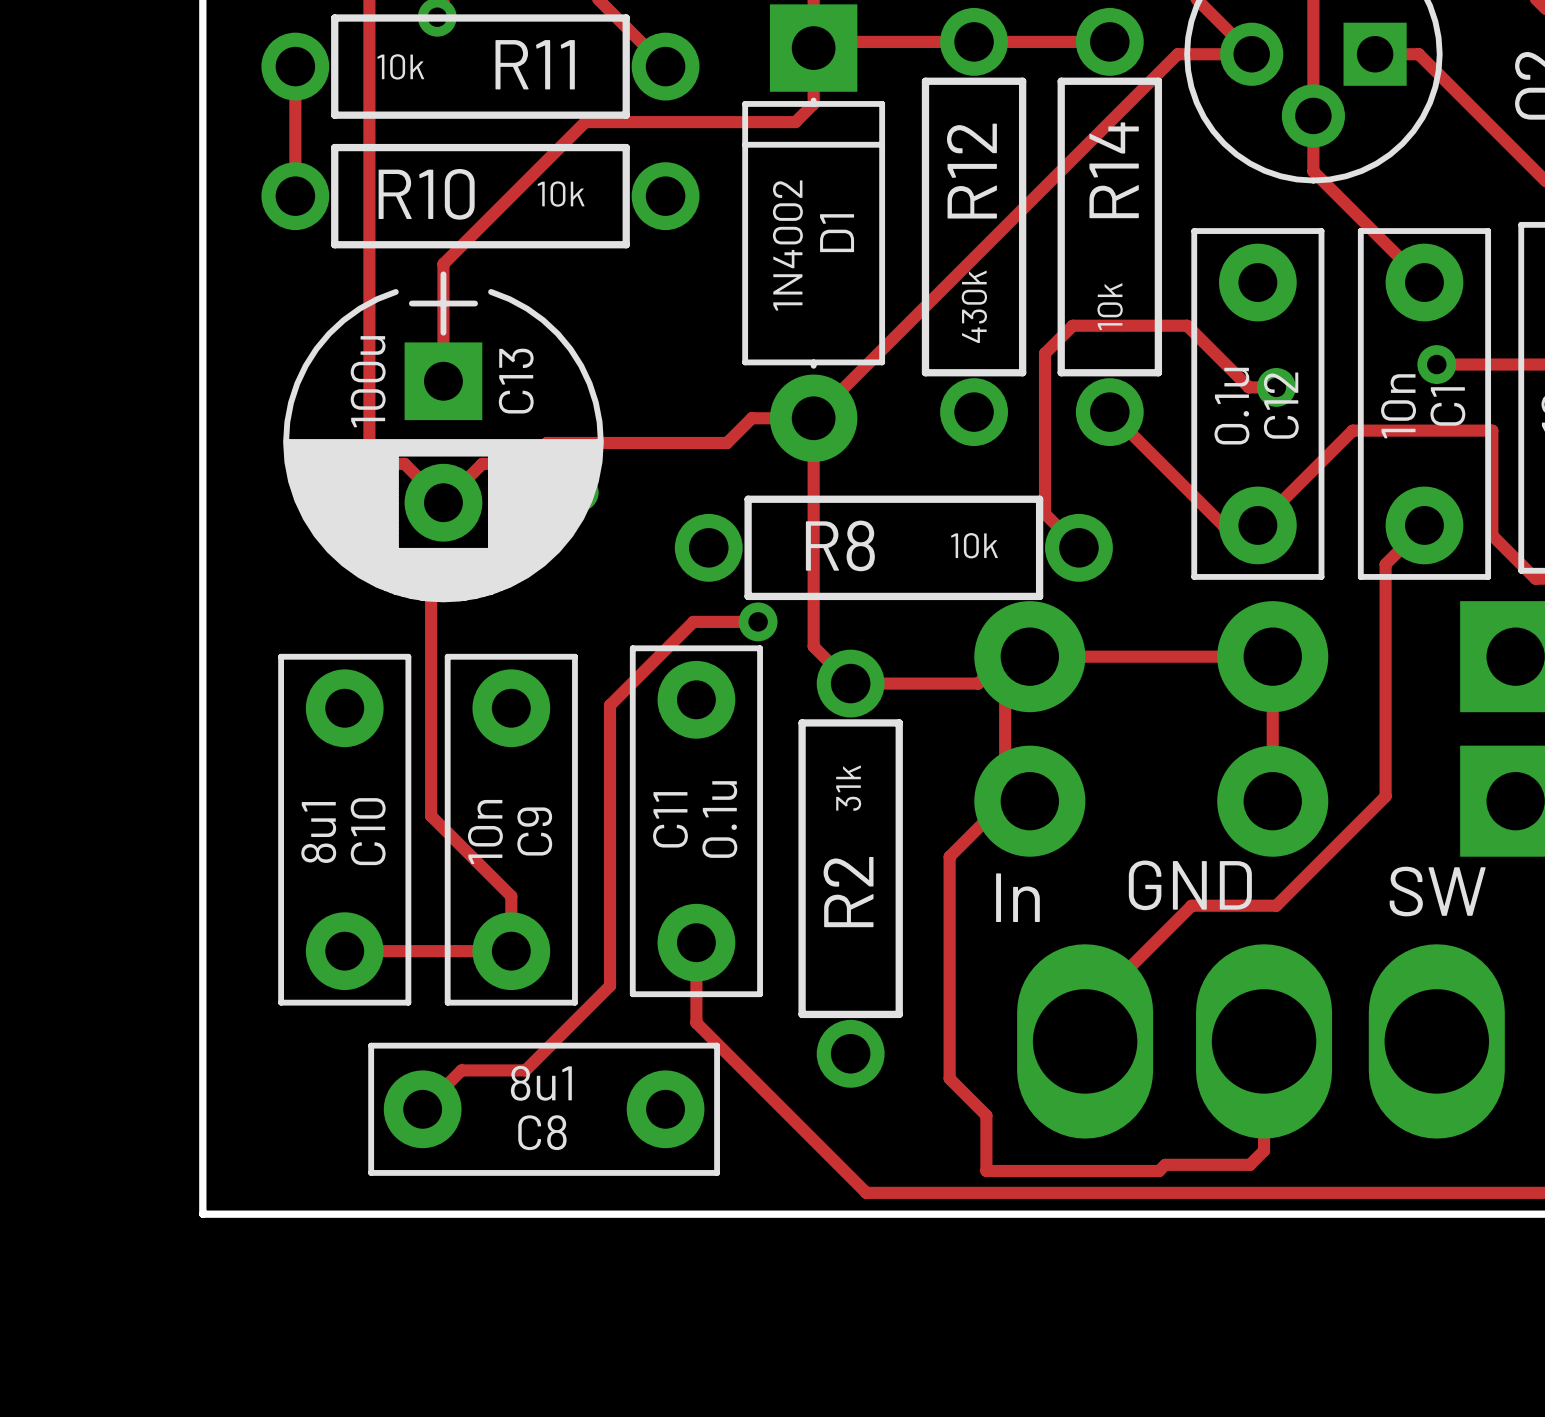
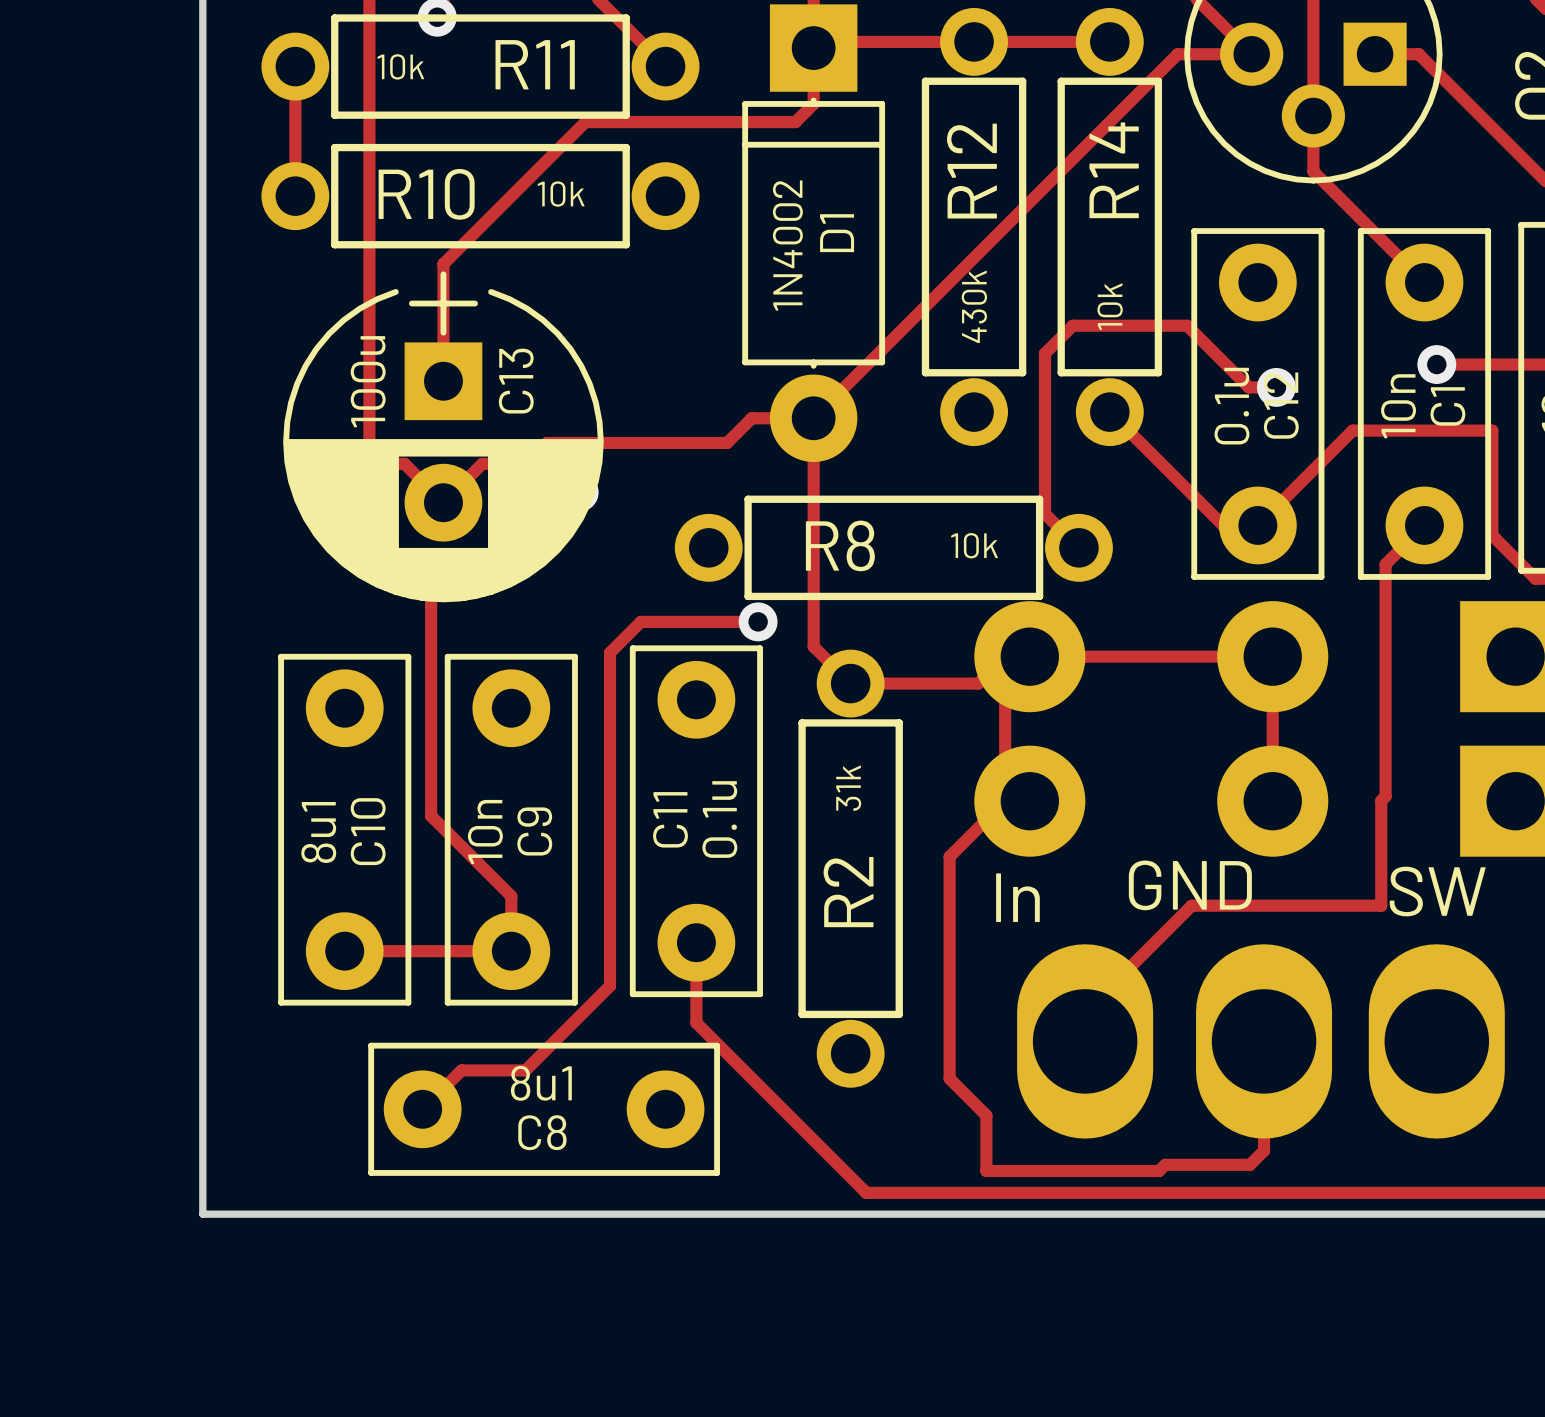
track: (693, 621) (610, 705) -> (693, 621) (640, 621) (610, 652) (610, 705)
track: (1381, 800) (1276, 905) -> (1381, 800) (1381, 905) (1276, 905)

